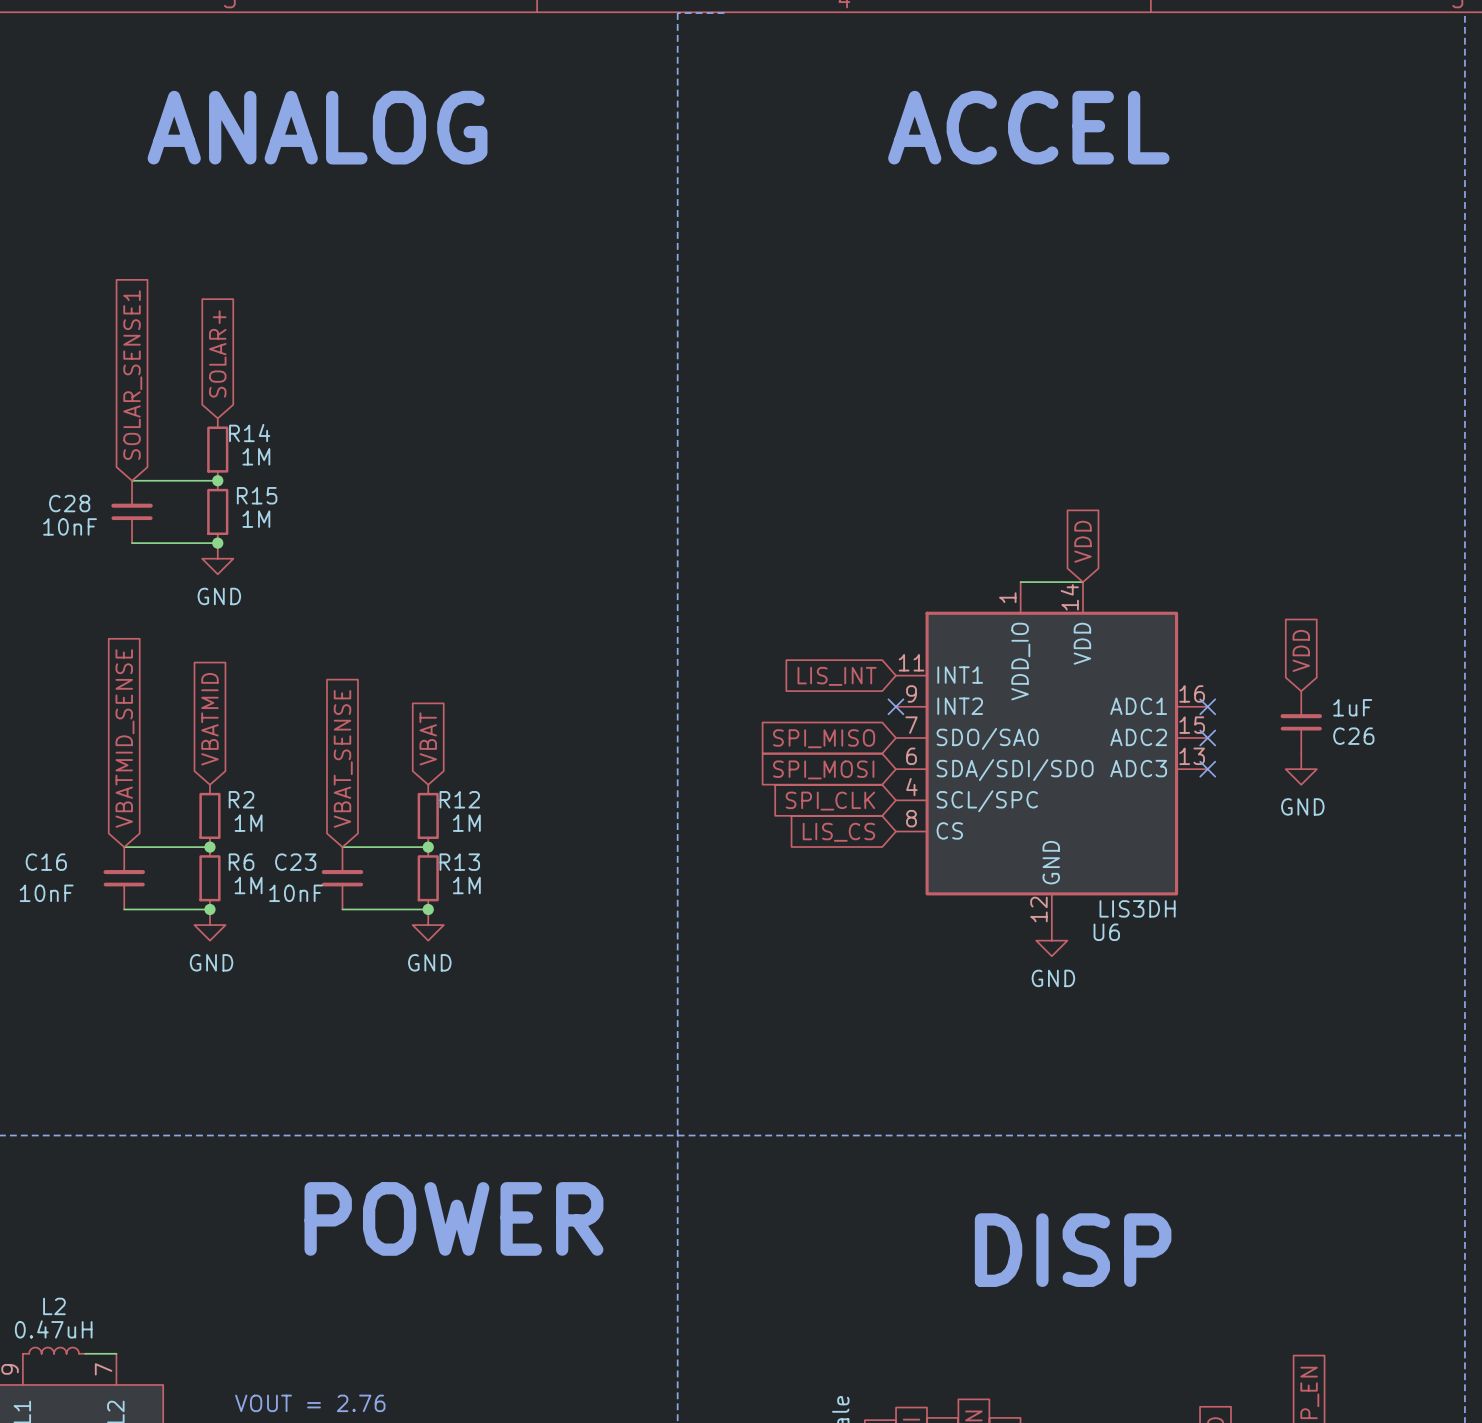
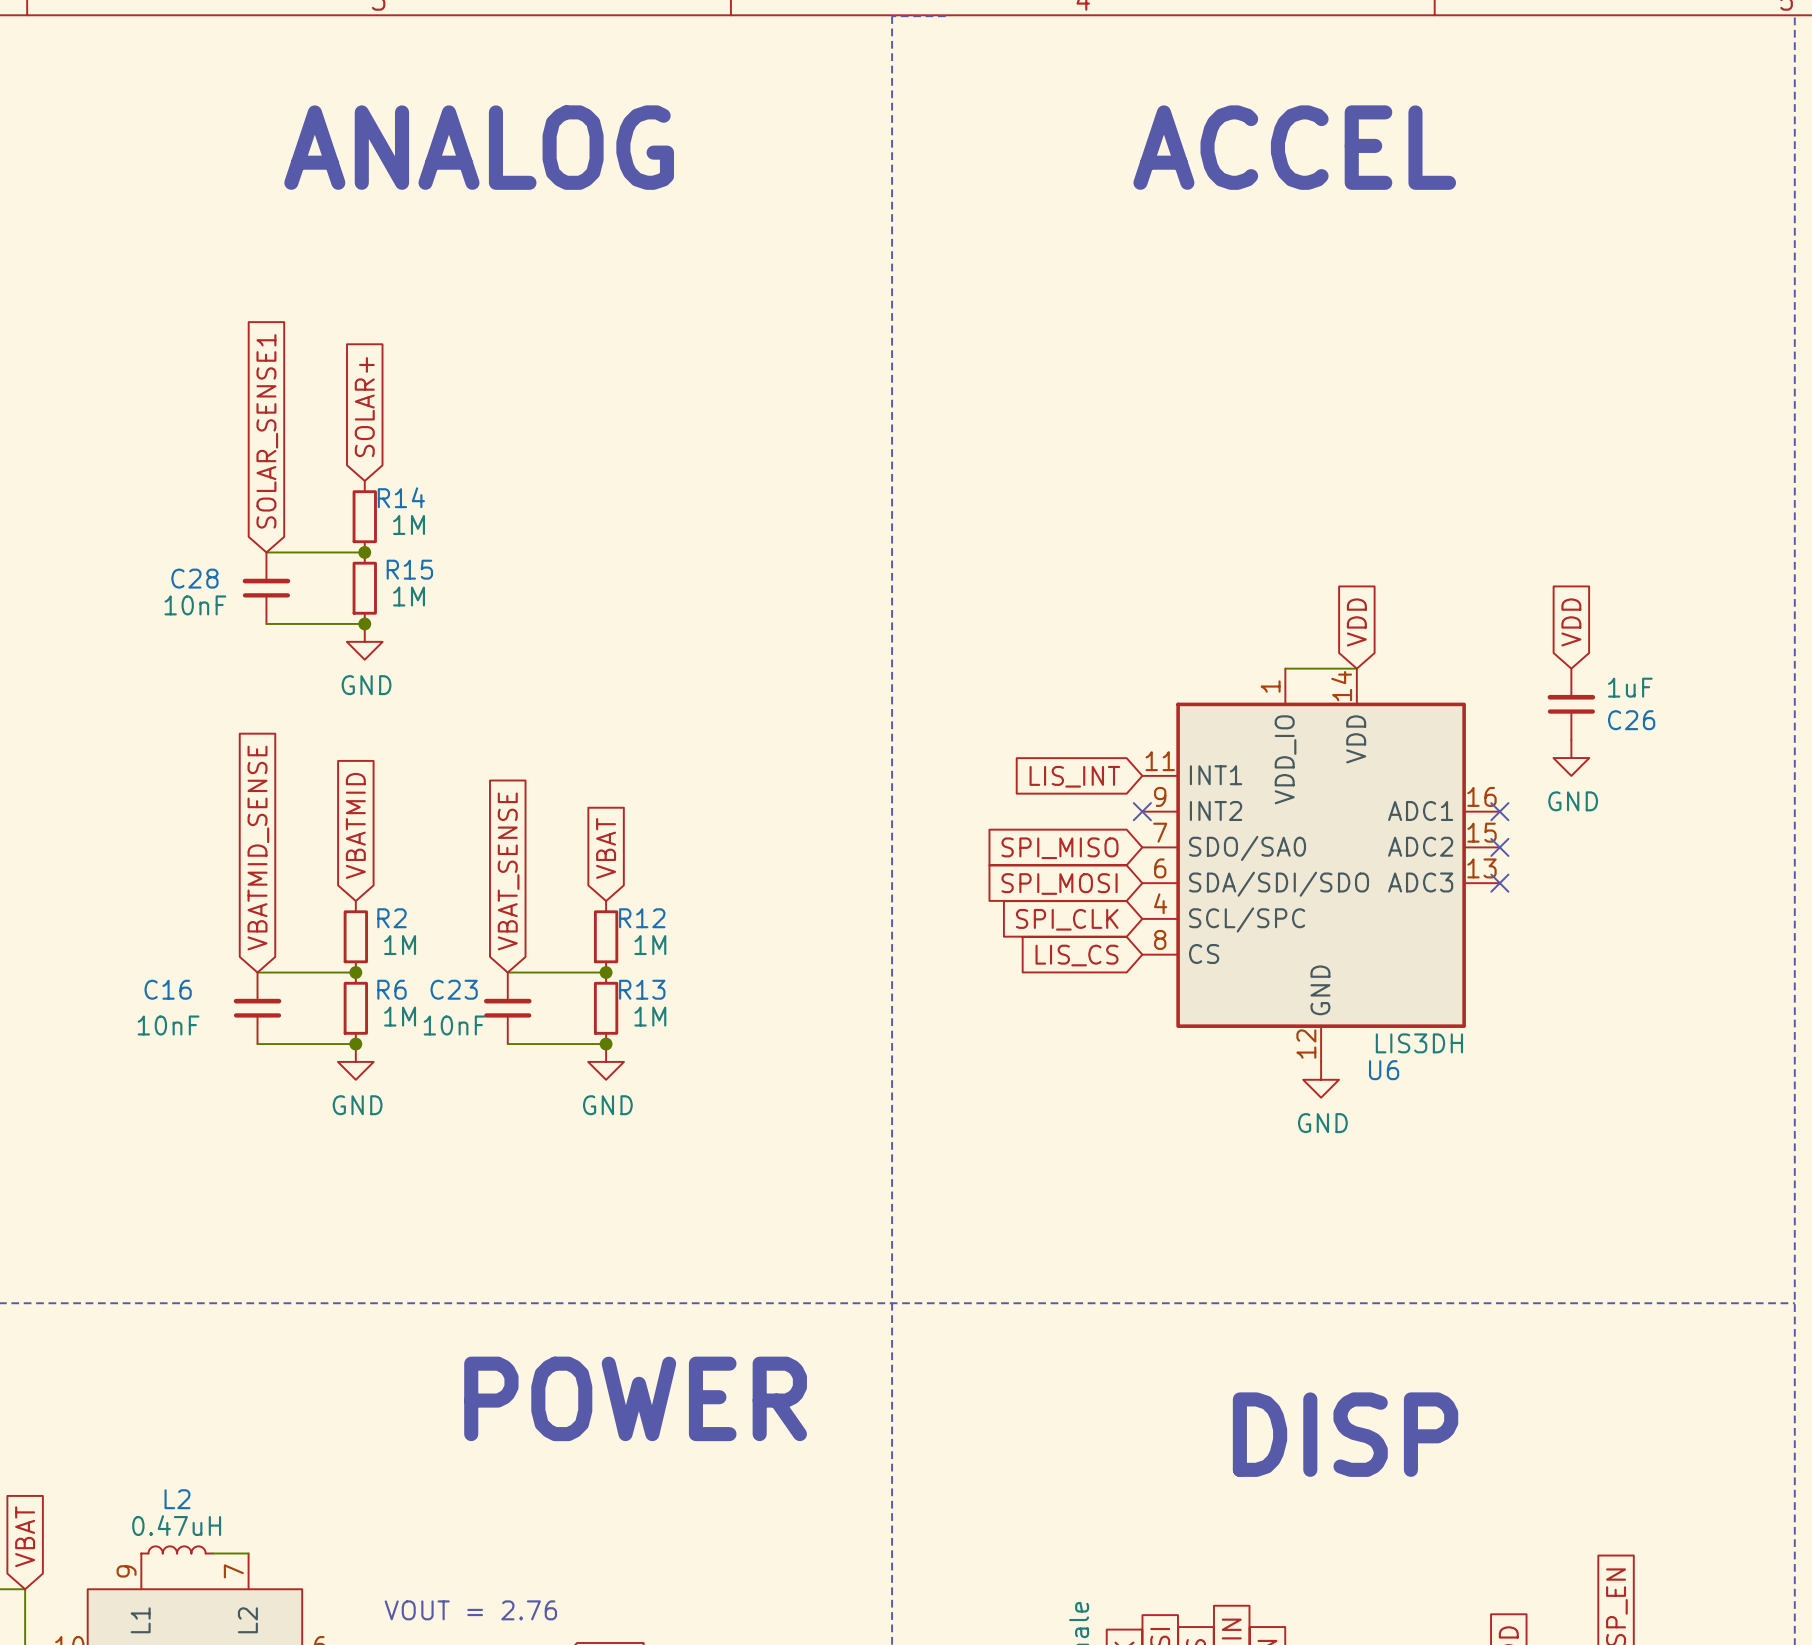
global label position: VDD (1301, 650) -> VDD (1571, 622)
C26 position: (1301, 722) -> (1571, 704)
power symbol position: GND (1301, 769) -> GND (1571, 758)

